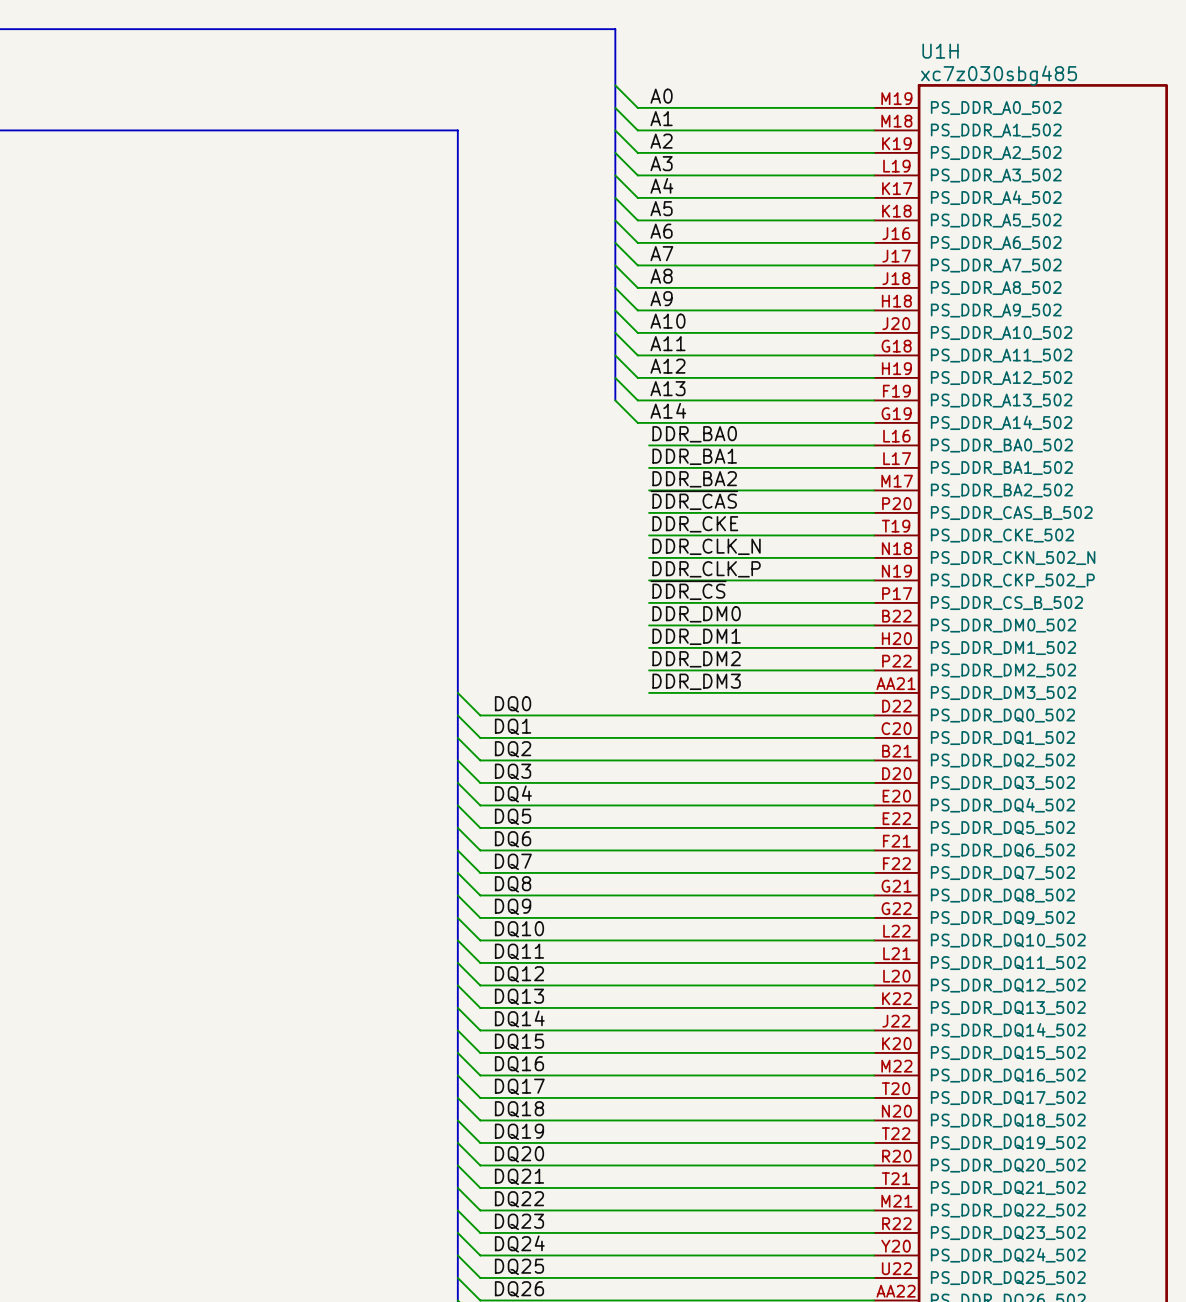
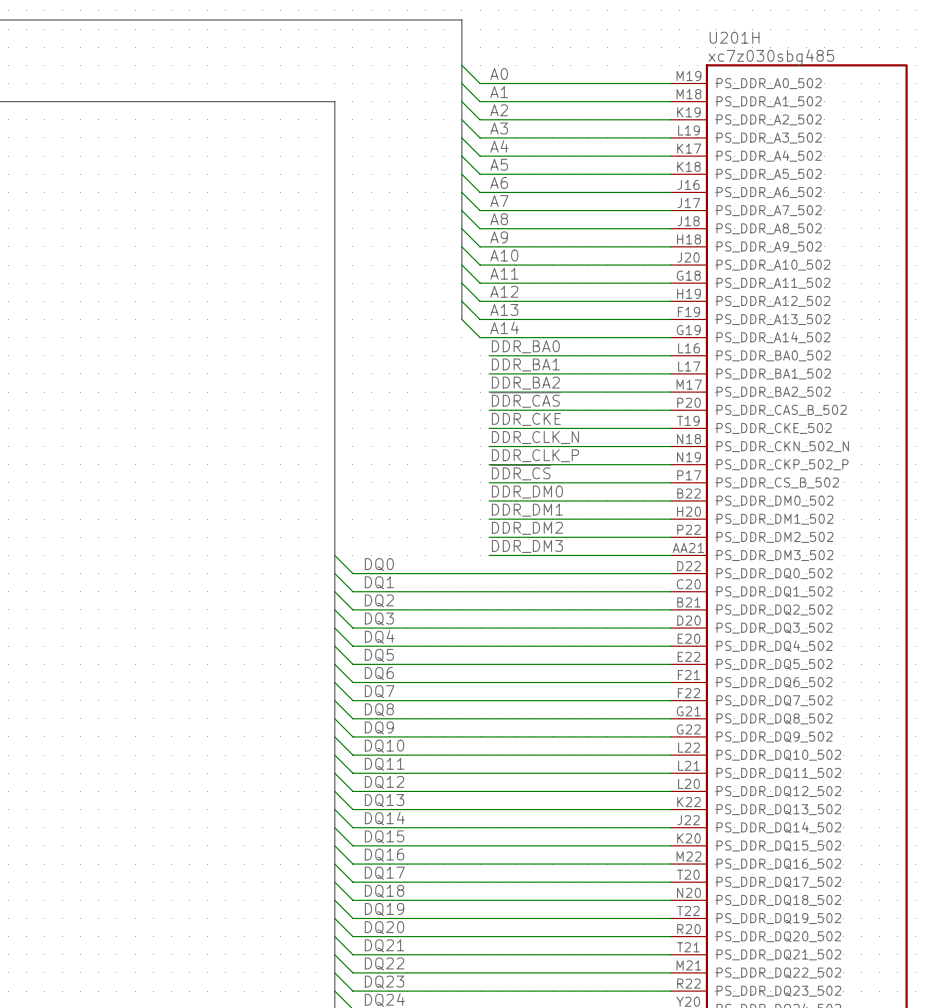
U1H name: U1H (940, 51) -> U201H (734, 37)

